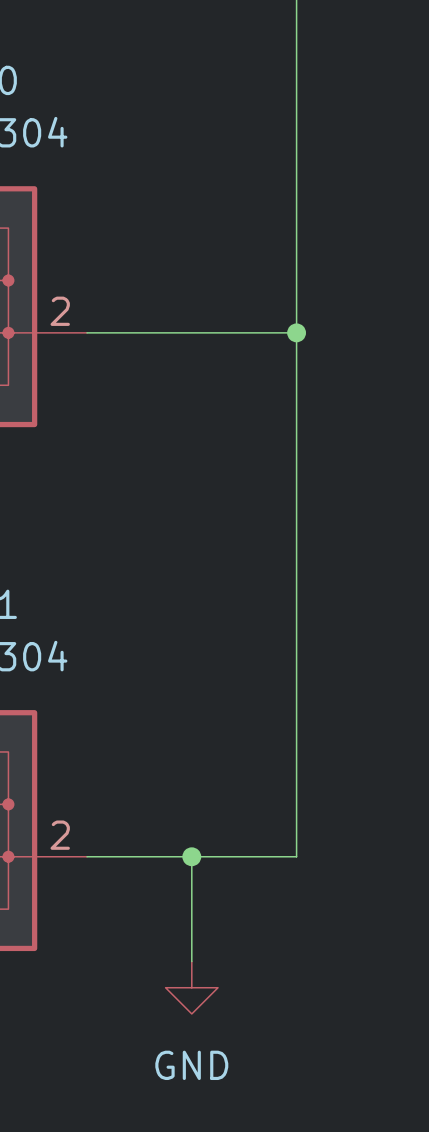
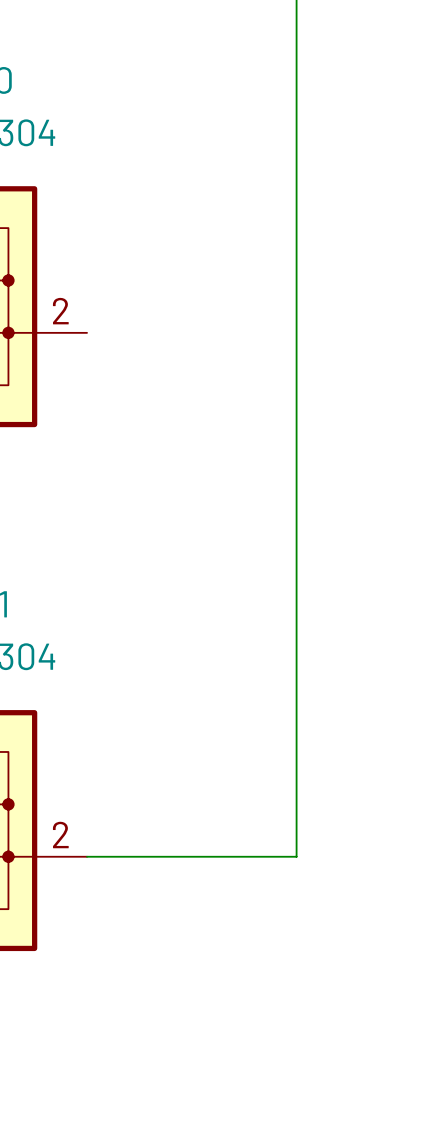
wire: (87, 332) (296, 332) -> none
junction: (296, 332) -> none
wire: (191, 856) (191, 961) -> none
junction: (191, 856) -> none
power symbol: GND (191, 987) -> none

